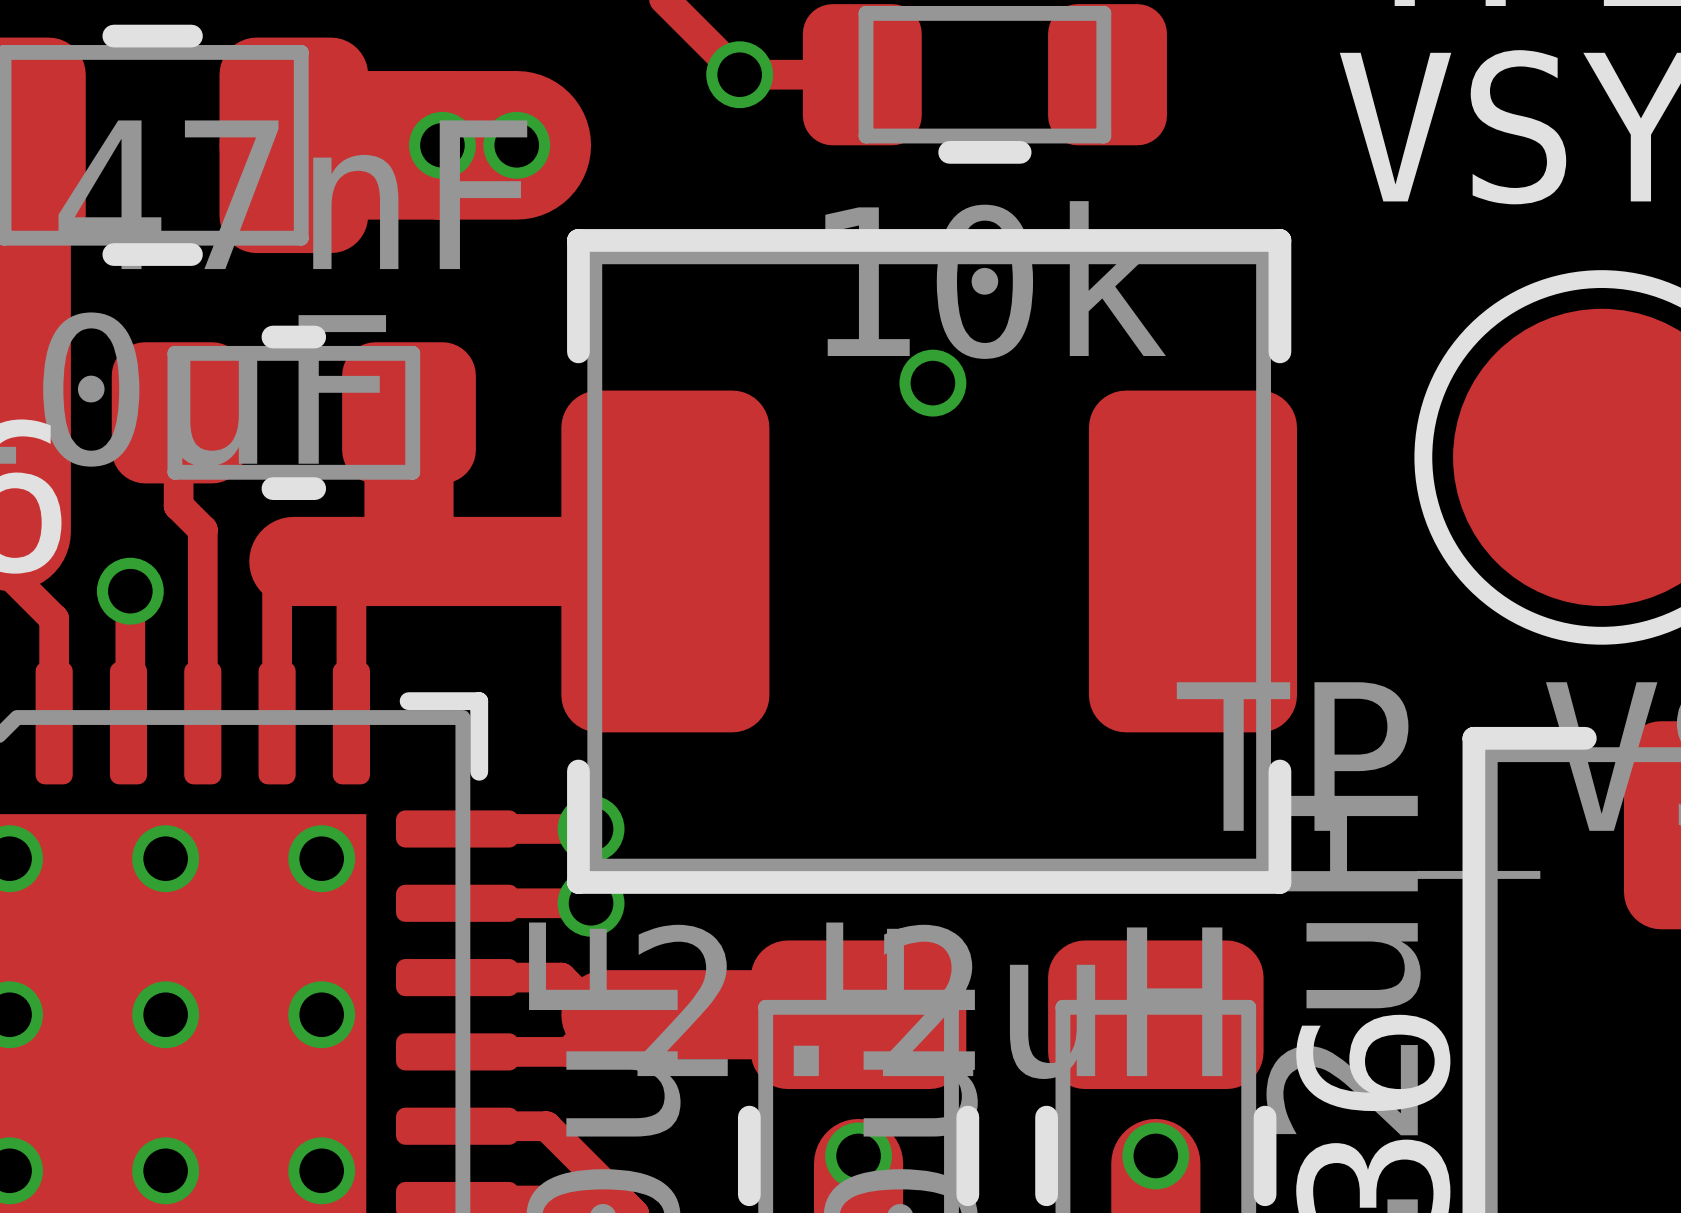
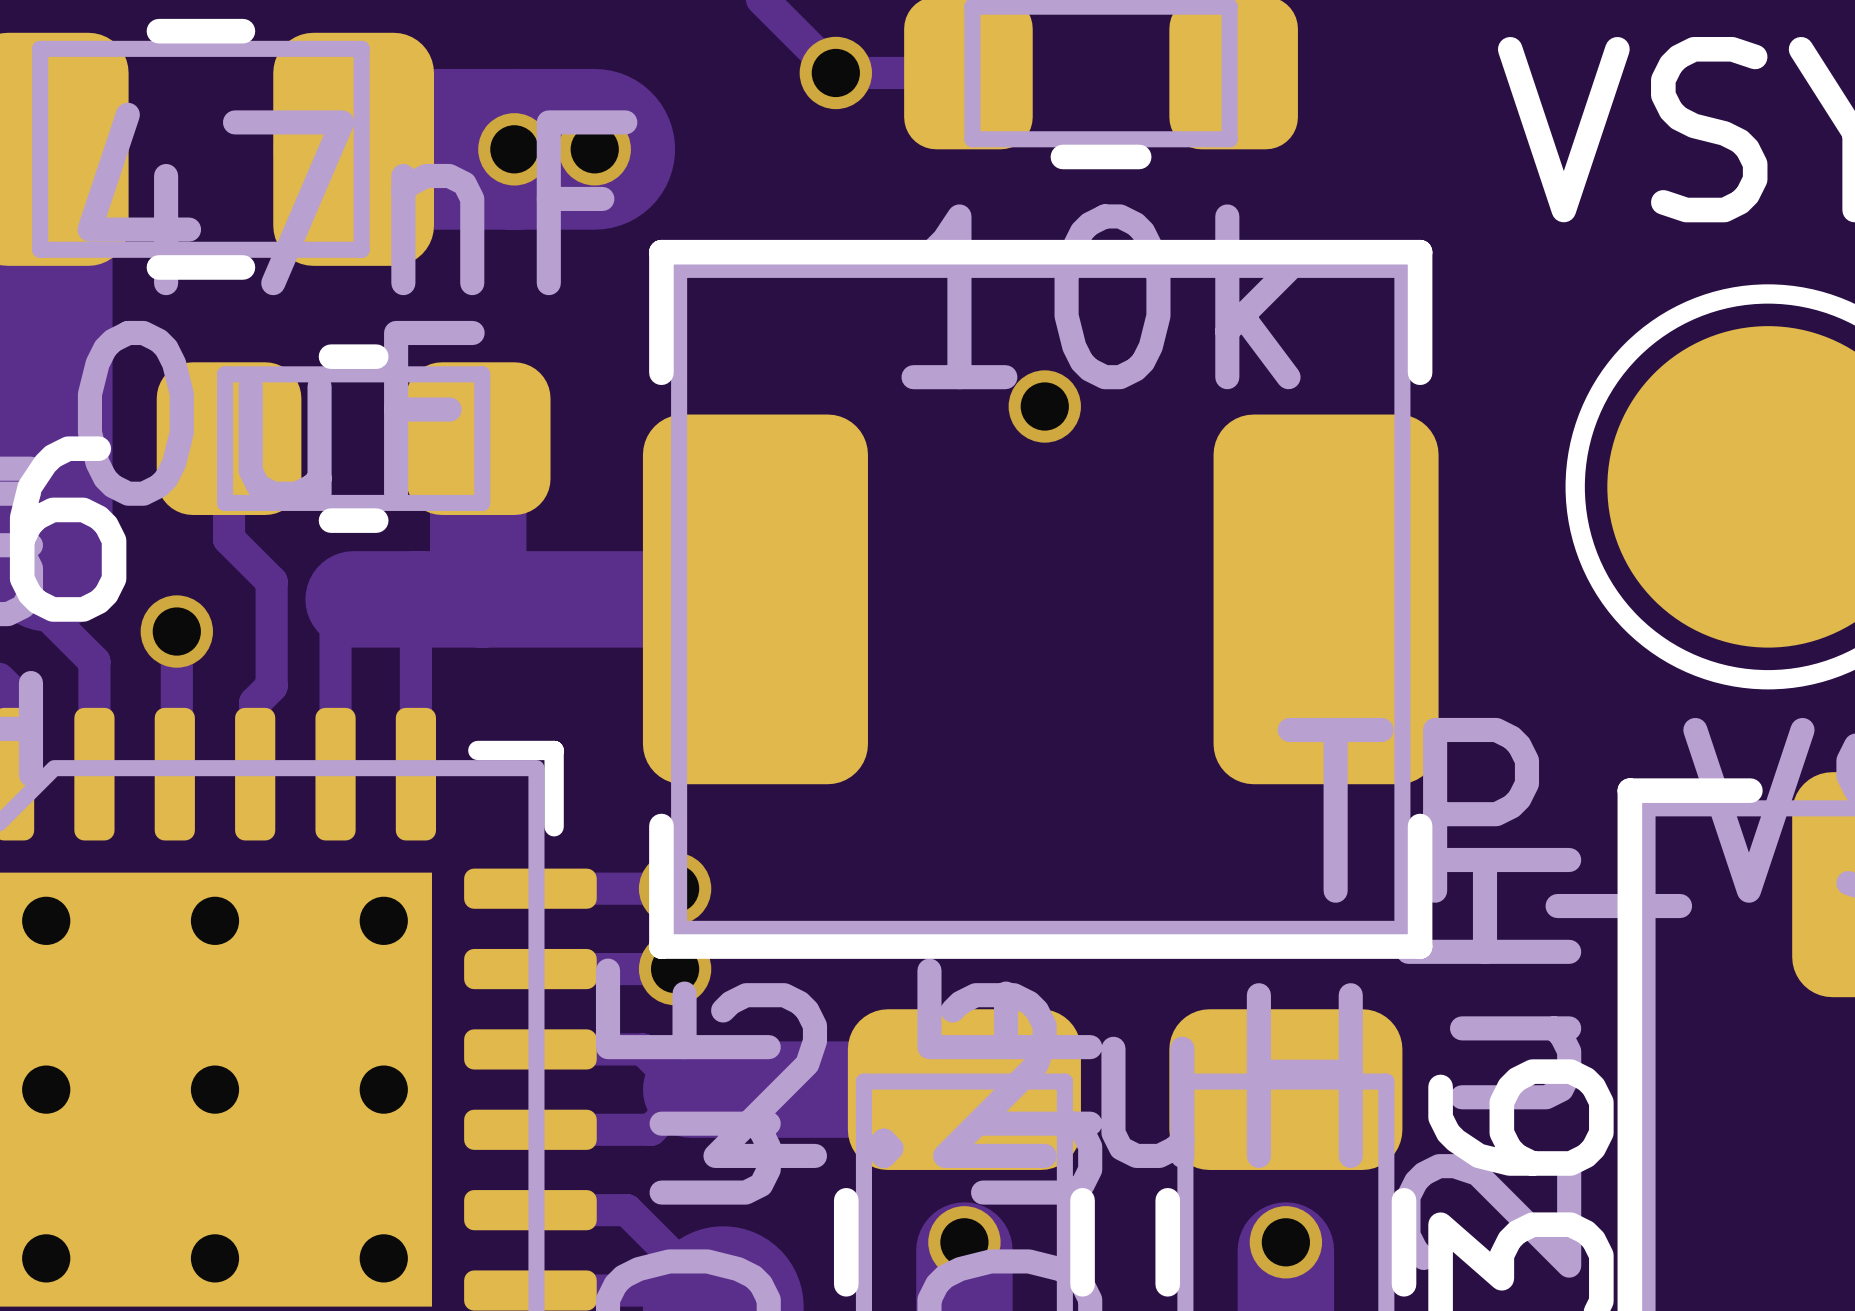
track: (202, 529) (202, 656) -> (255, 565) (271, 581) (271, 686) (255, 702)

